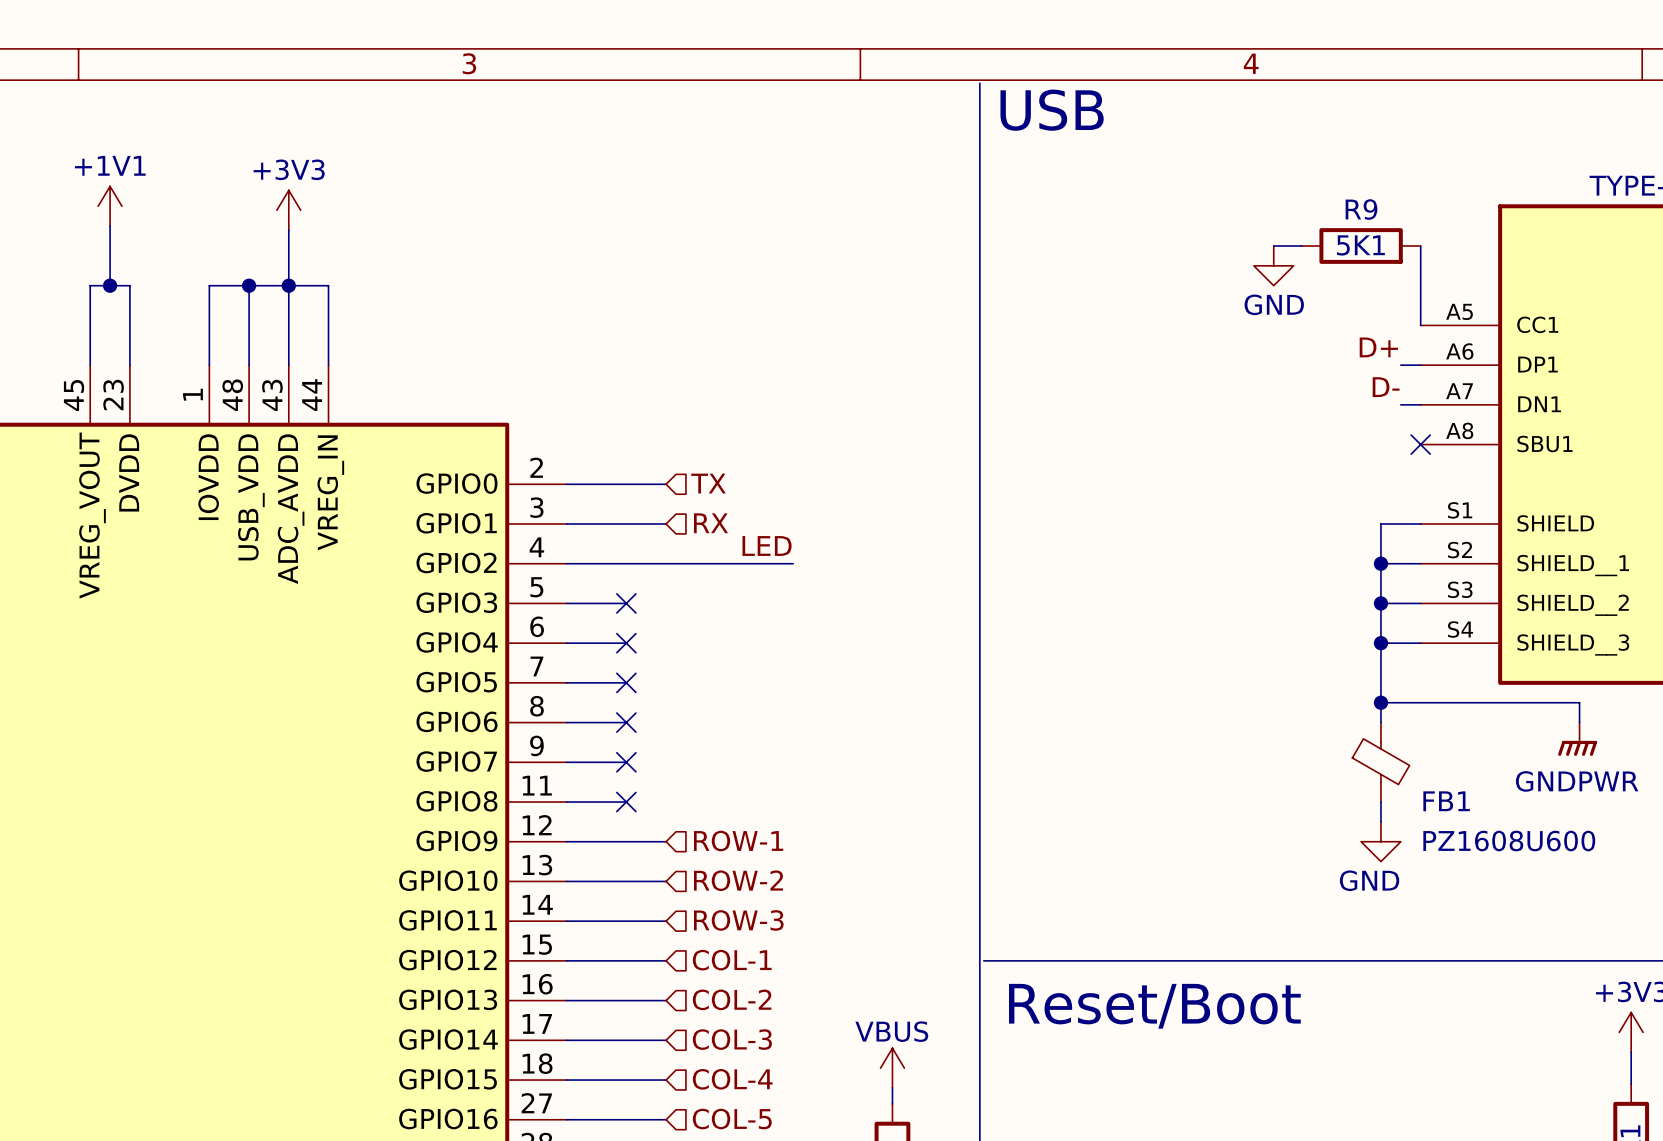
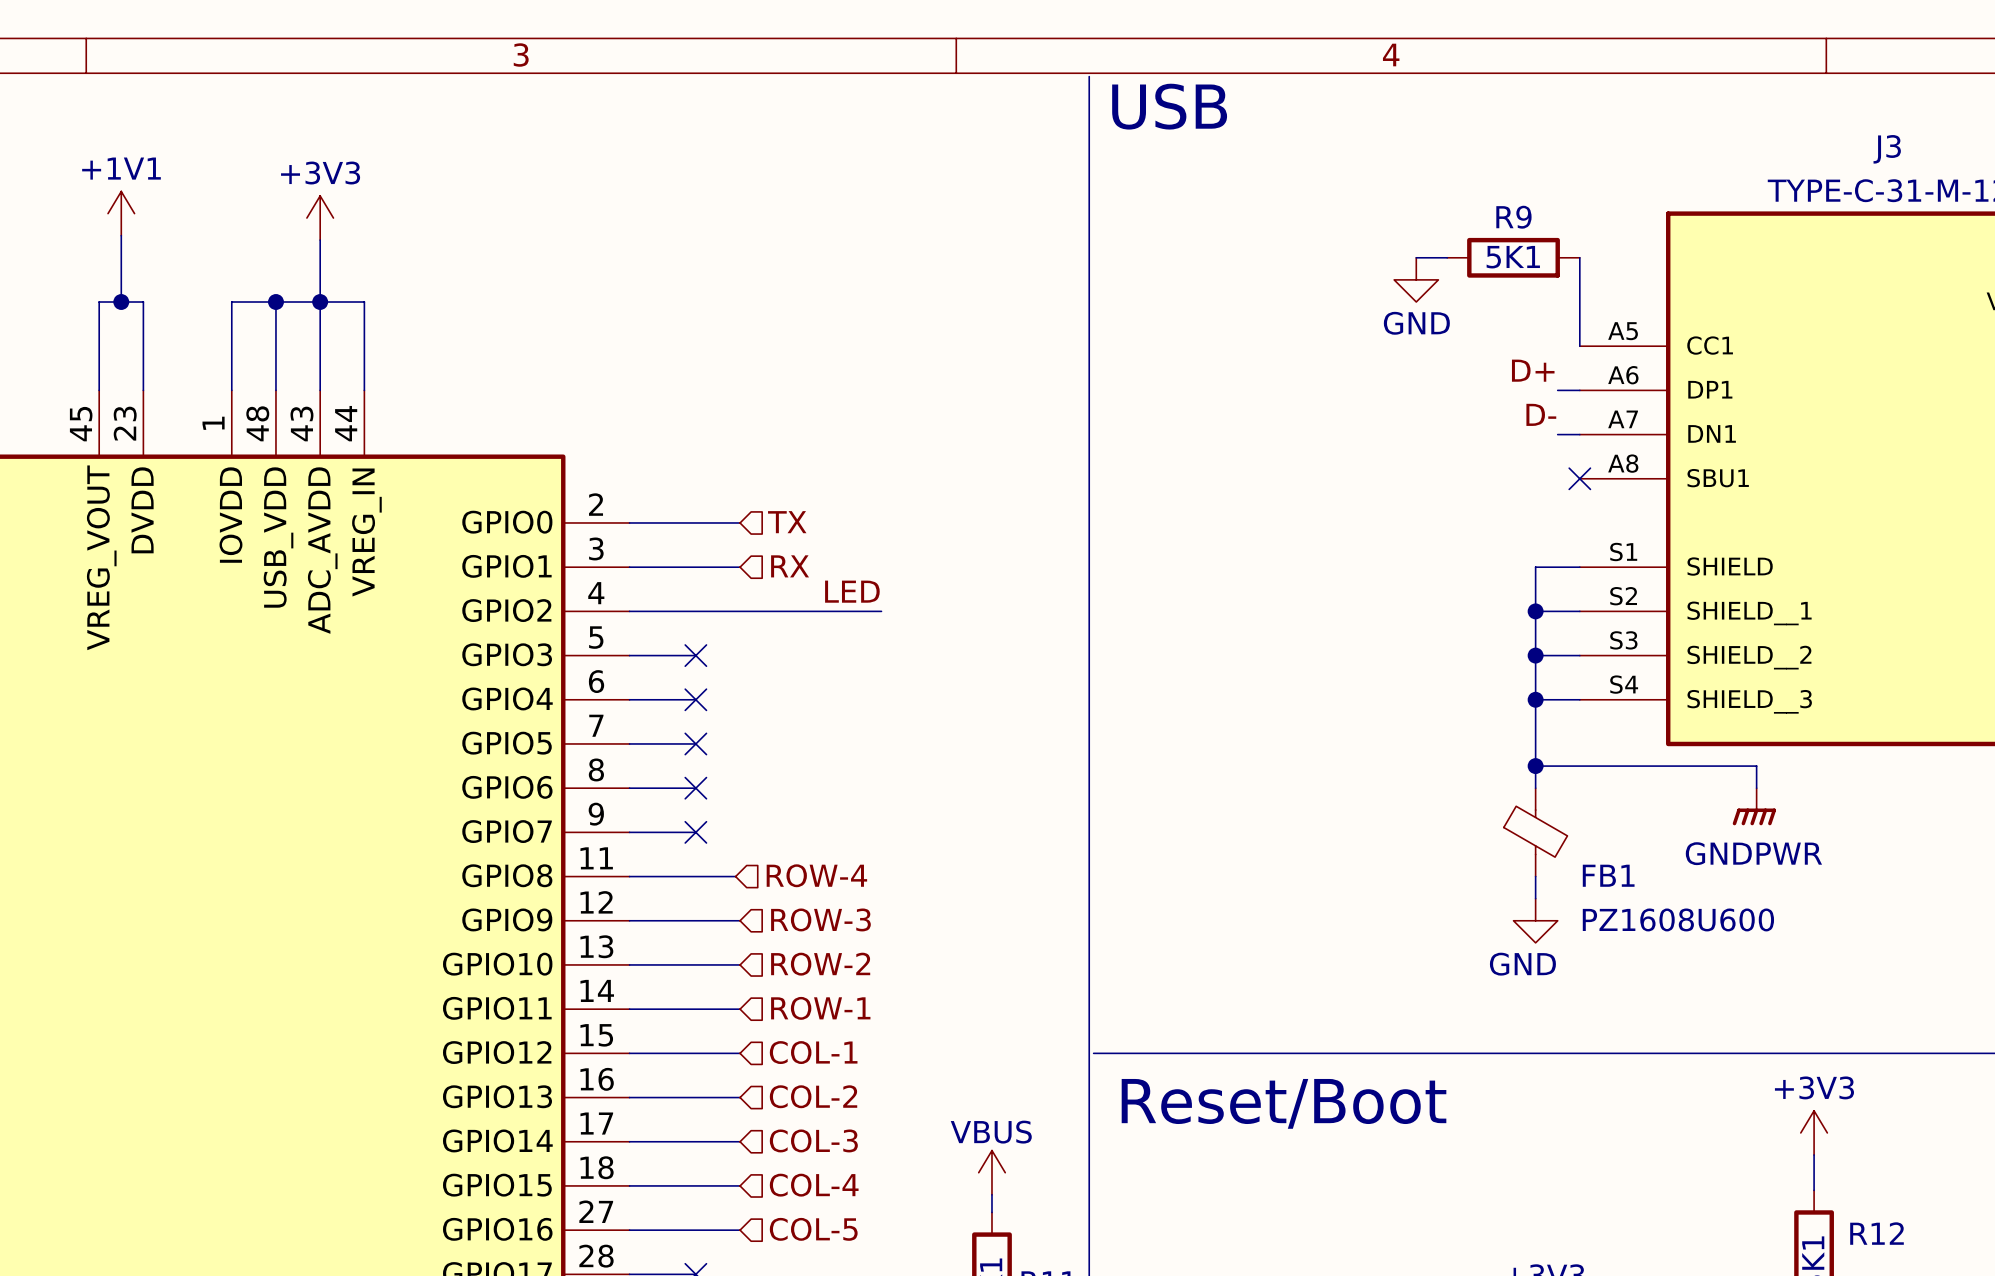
hierarchical label: none -> ROW-4 (816, 875)
wire: none -> (695, 876) (735, 876)
no-connect mark: (626, 802) -> none
hierarchical label: ROW-1 (738, 841) -> ROW-3 (820, 919)
hierarchical label: ROW-3 (738, 920) -> ROW-1 (820, 1008)

